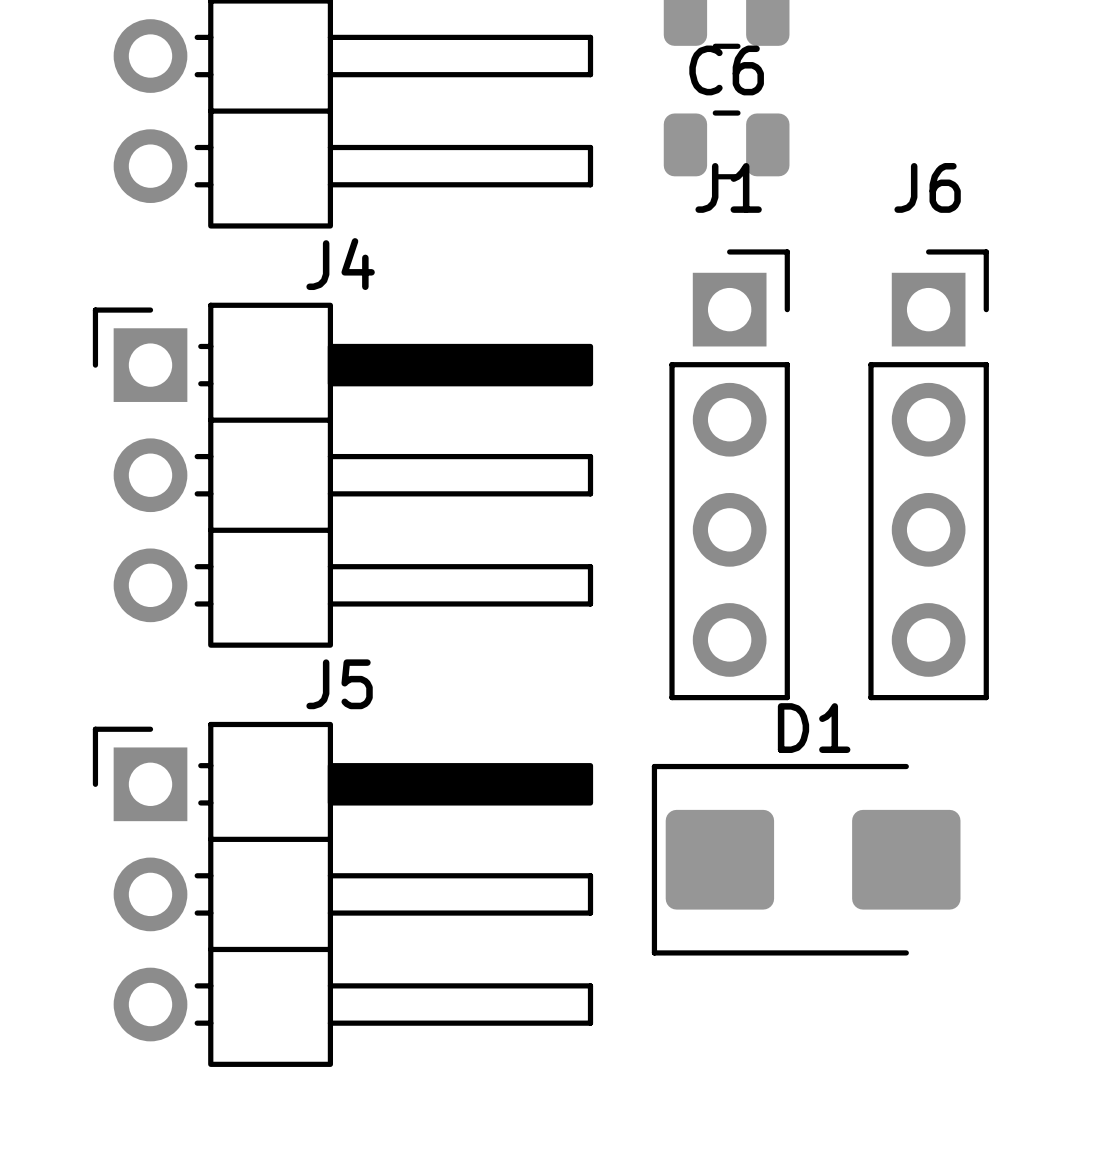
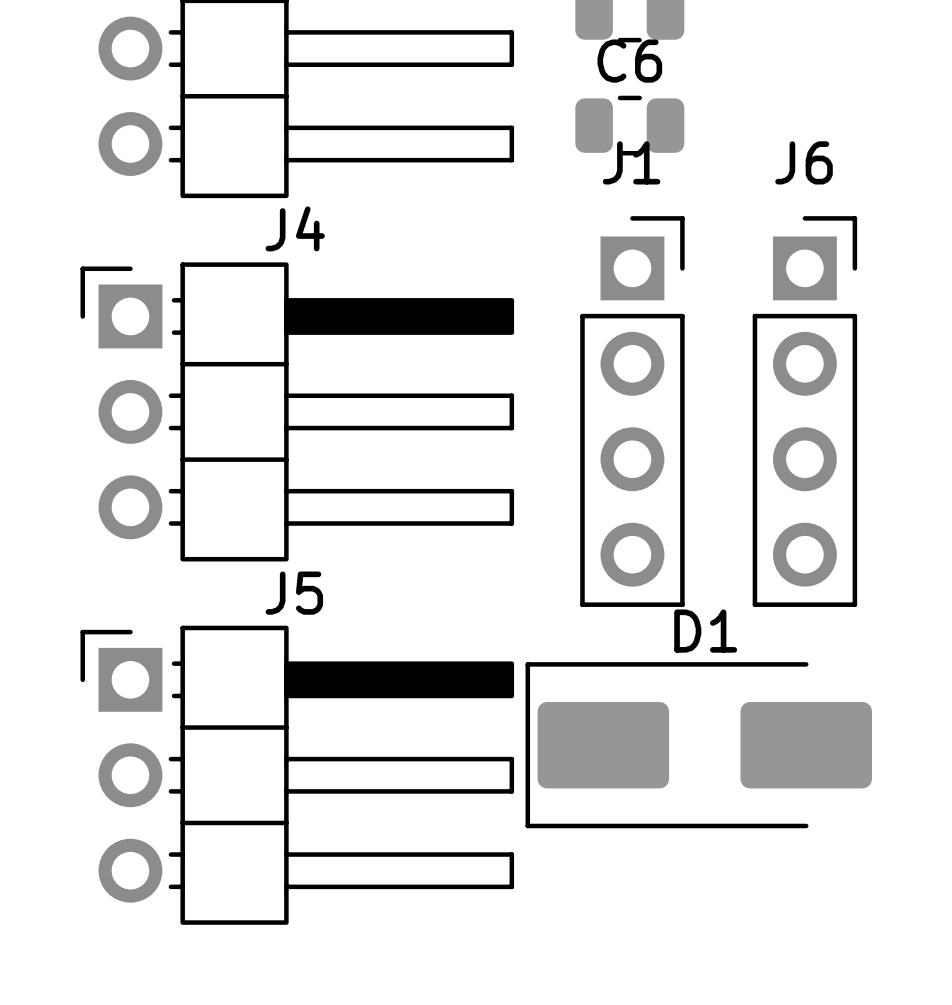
D1 footprint: [651, 763, 961, 956] -> [525, 662, 872, 829]

